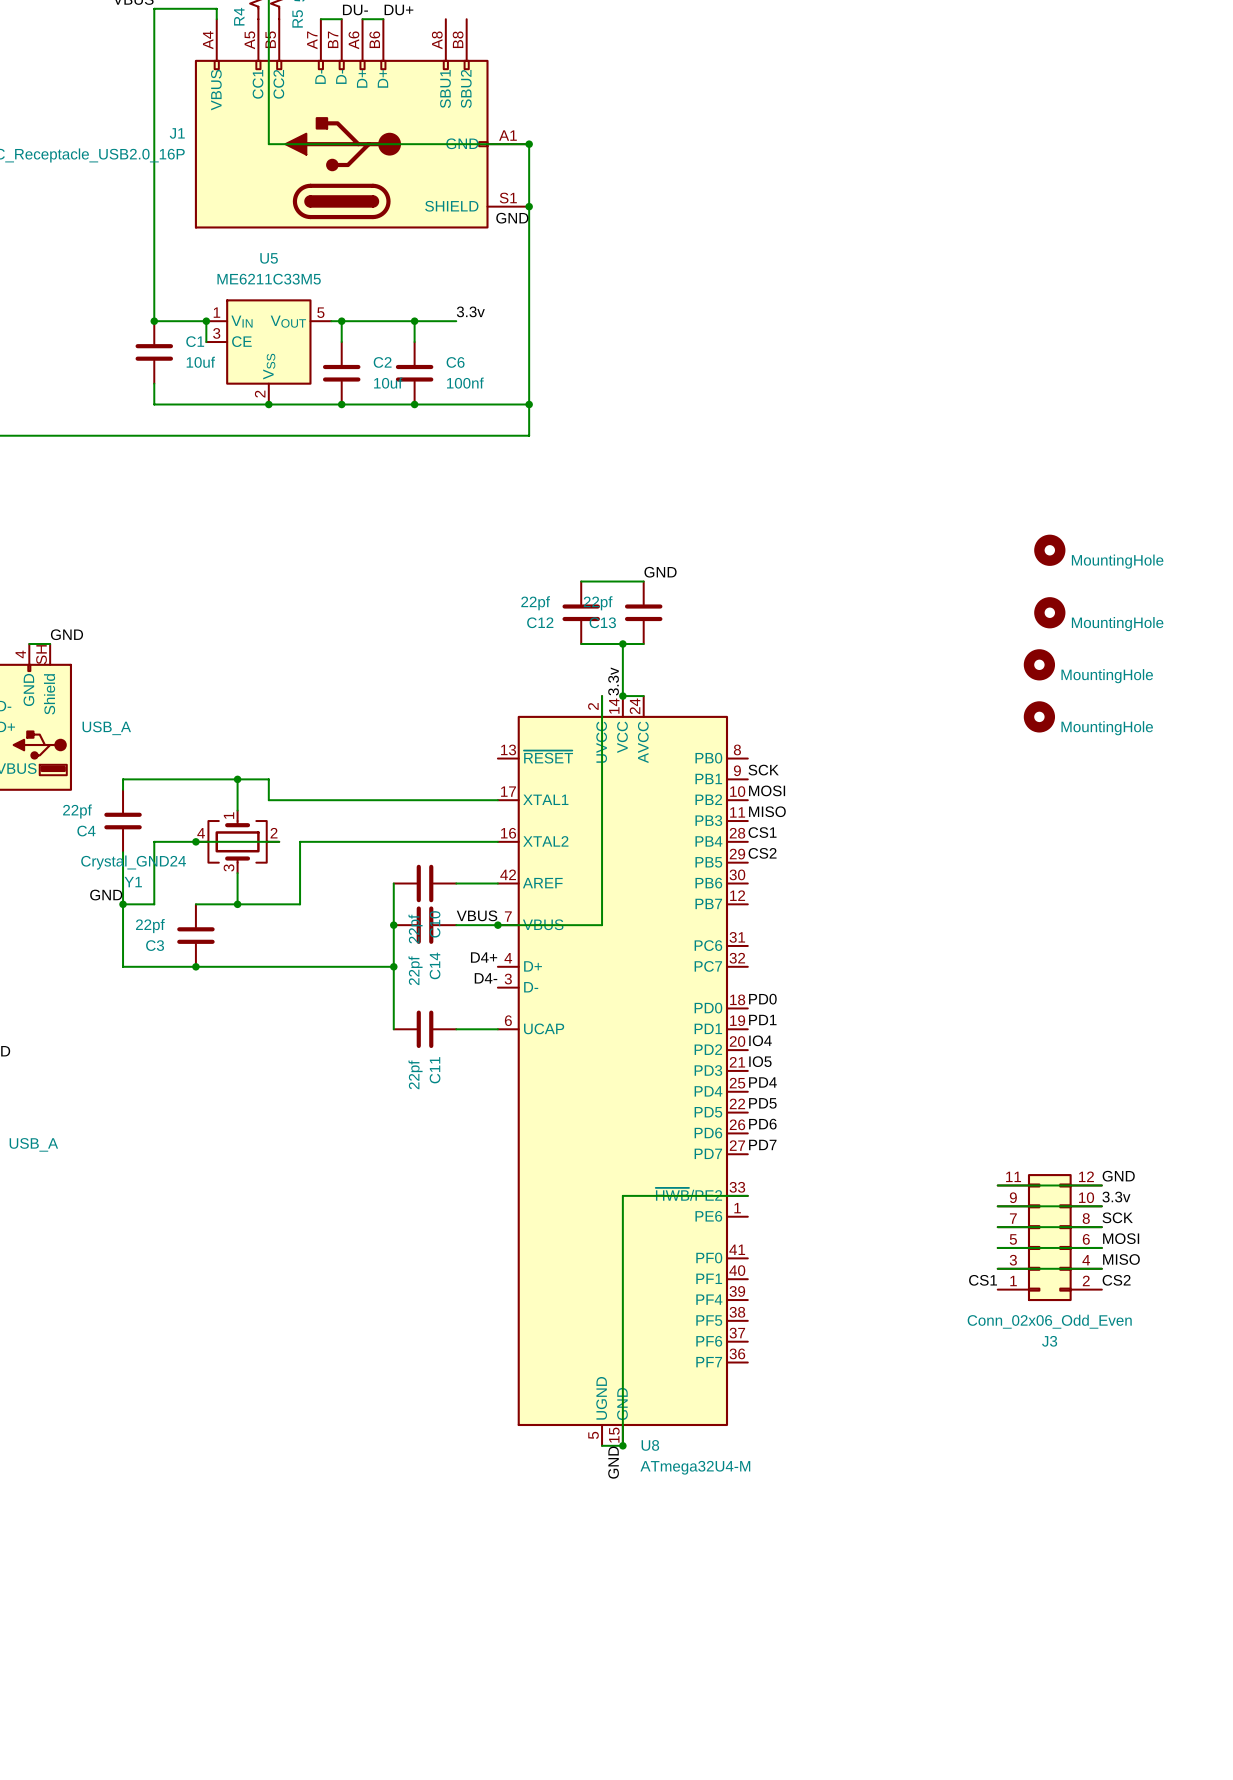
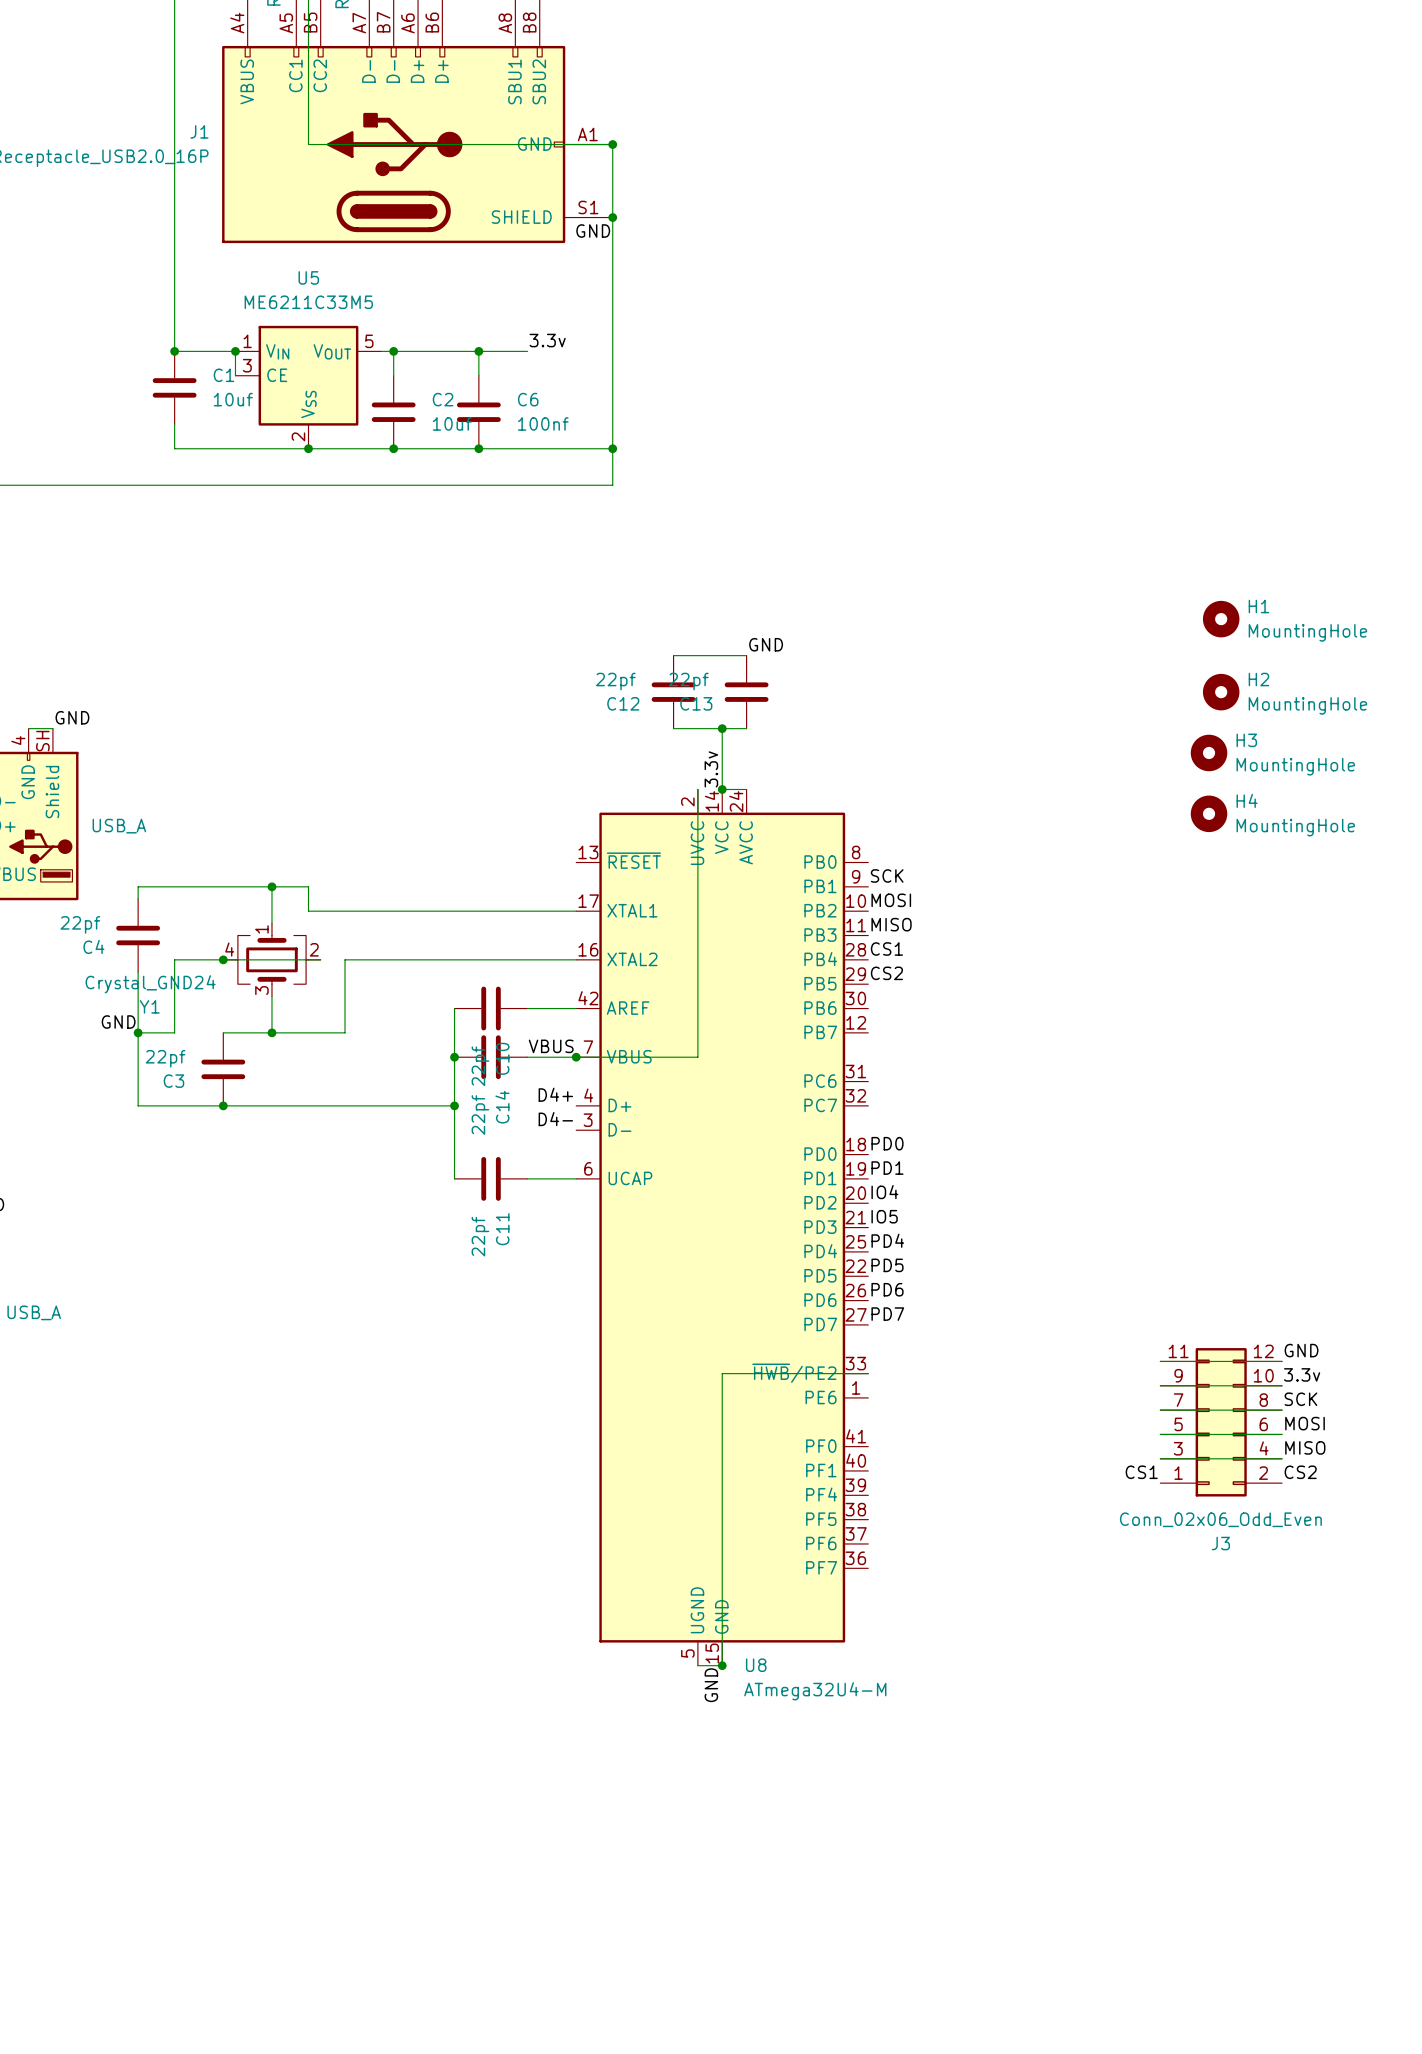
H1 name: none -> H1 (1258, 606)
H2 name: none -> H2 (1258, 679)
H3 name: none -> H3 (1246, 740)
H4 name: none -> H4 (1247, 800)

